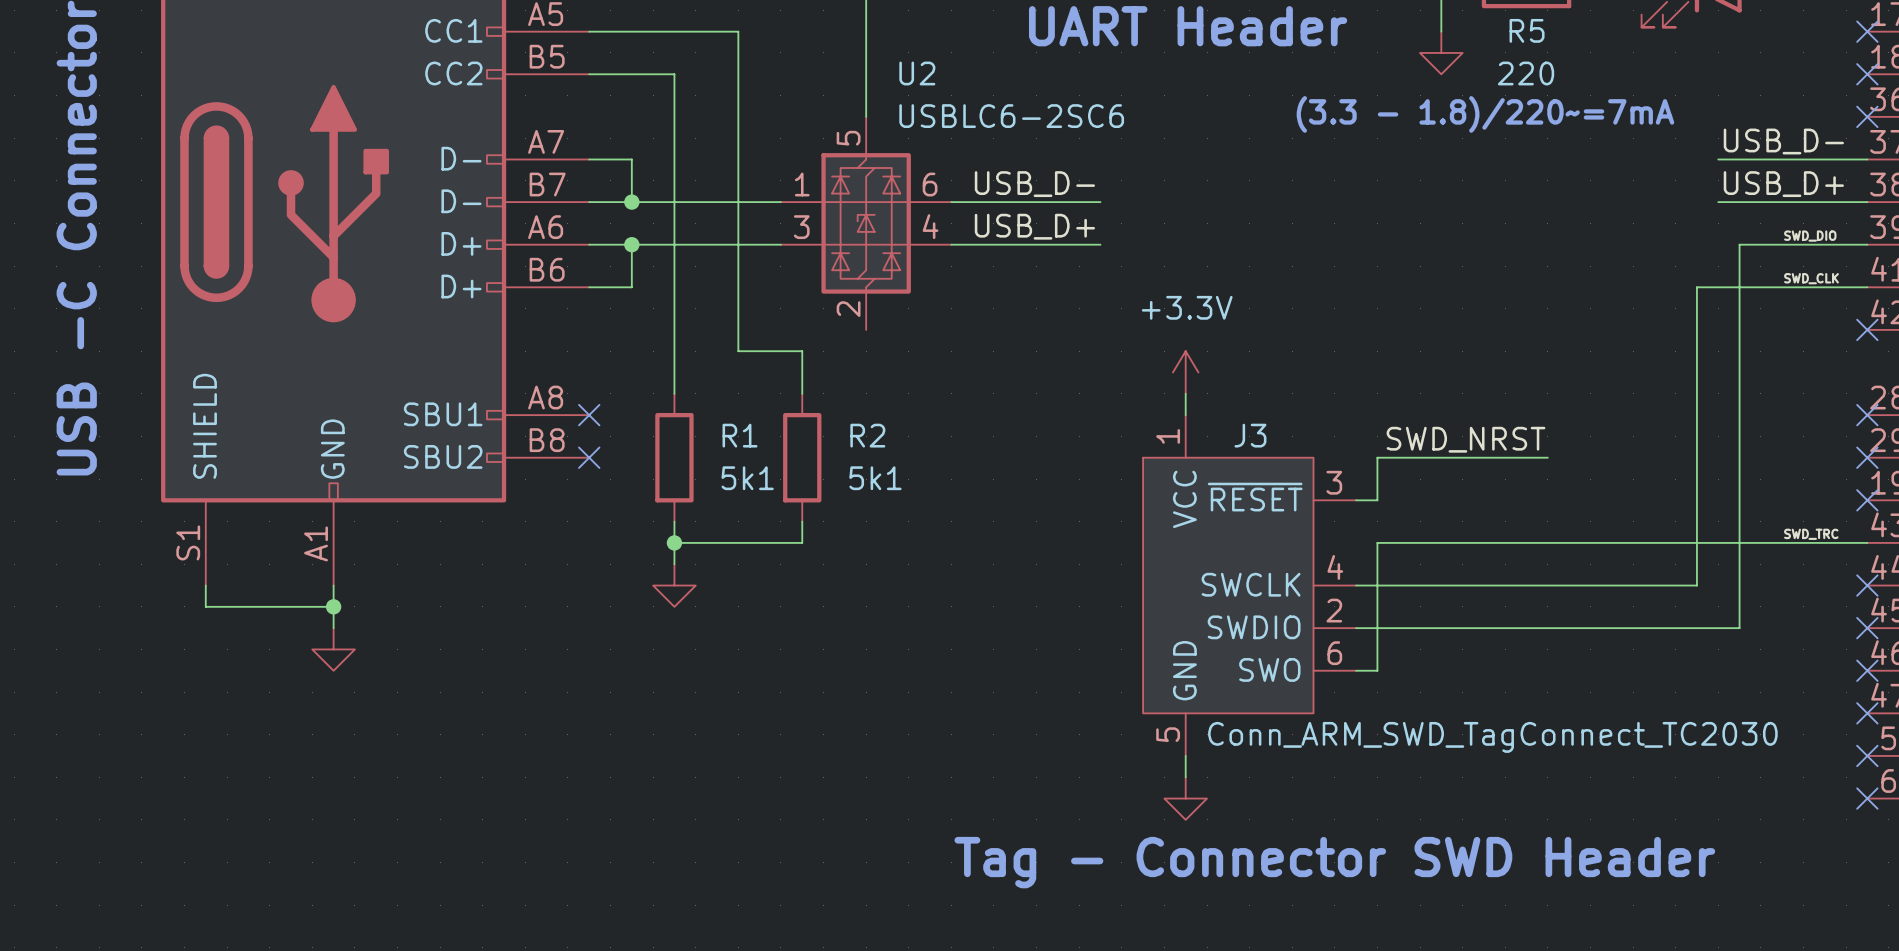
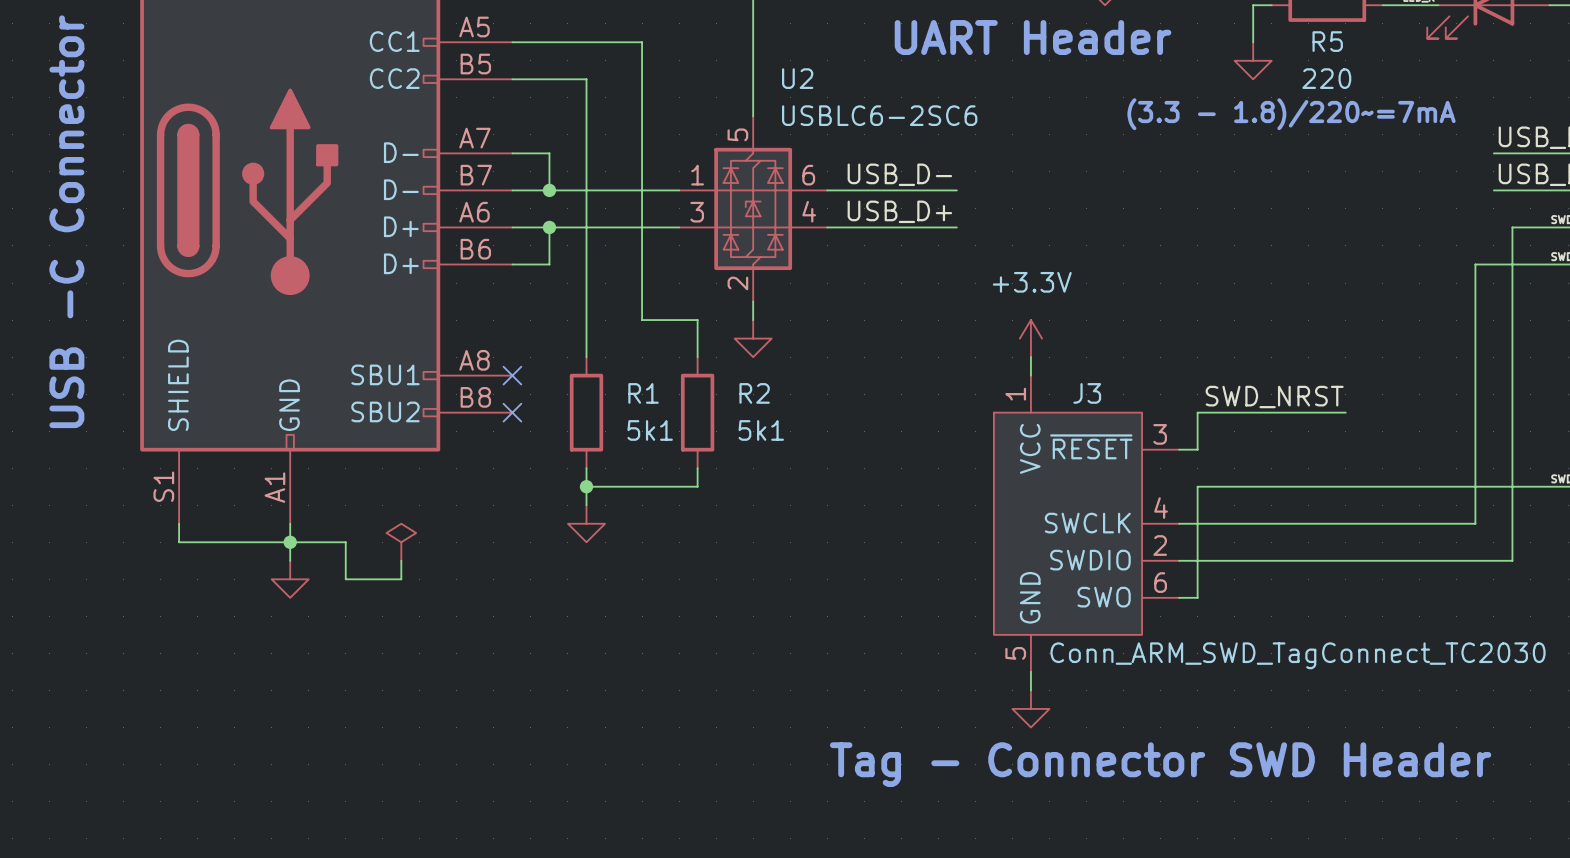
wire: none -> (753, 301) (753, 320)
power symbol: none -> (753, 338)
wire: none -> (290, 542) (345, 542) (345, 579) (401, 579) (401, 560)
power symbol: none -> (401, 542)

